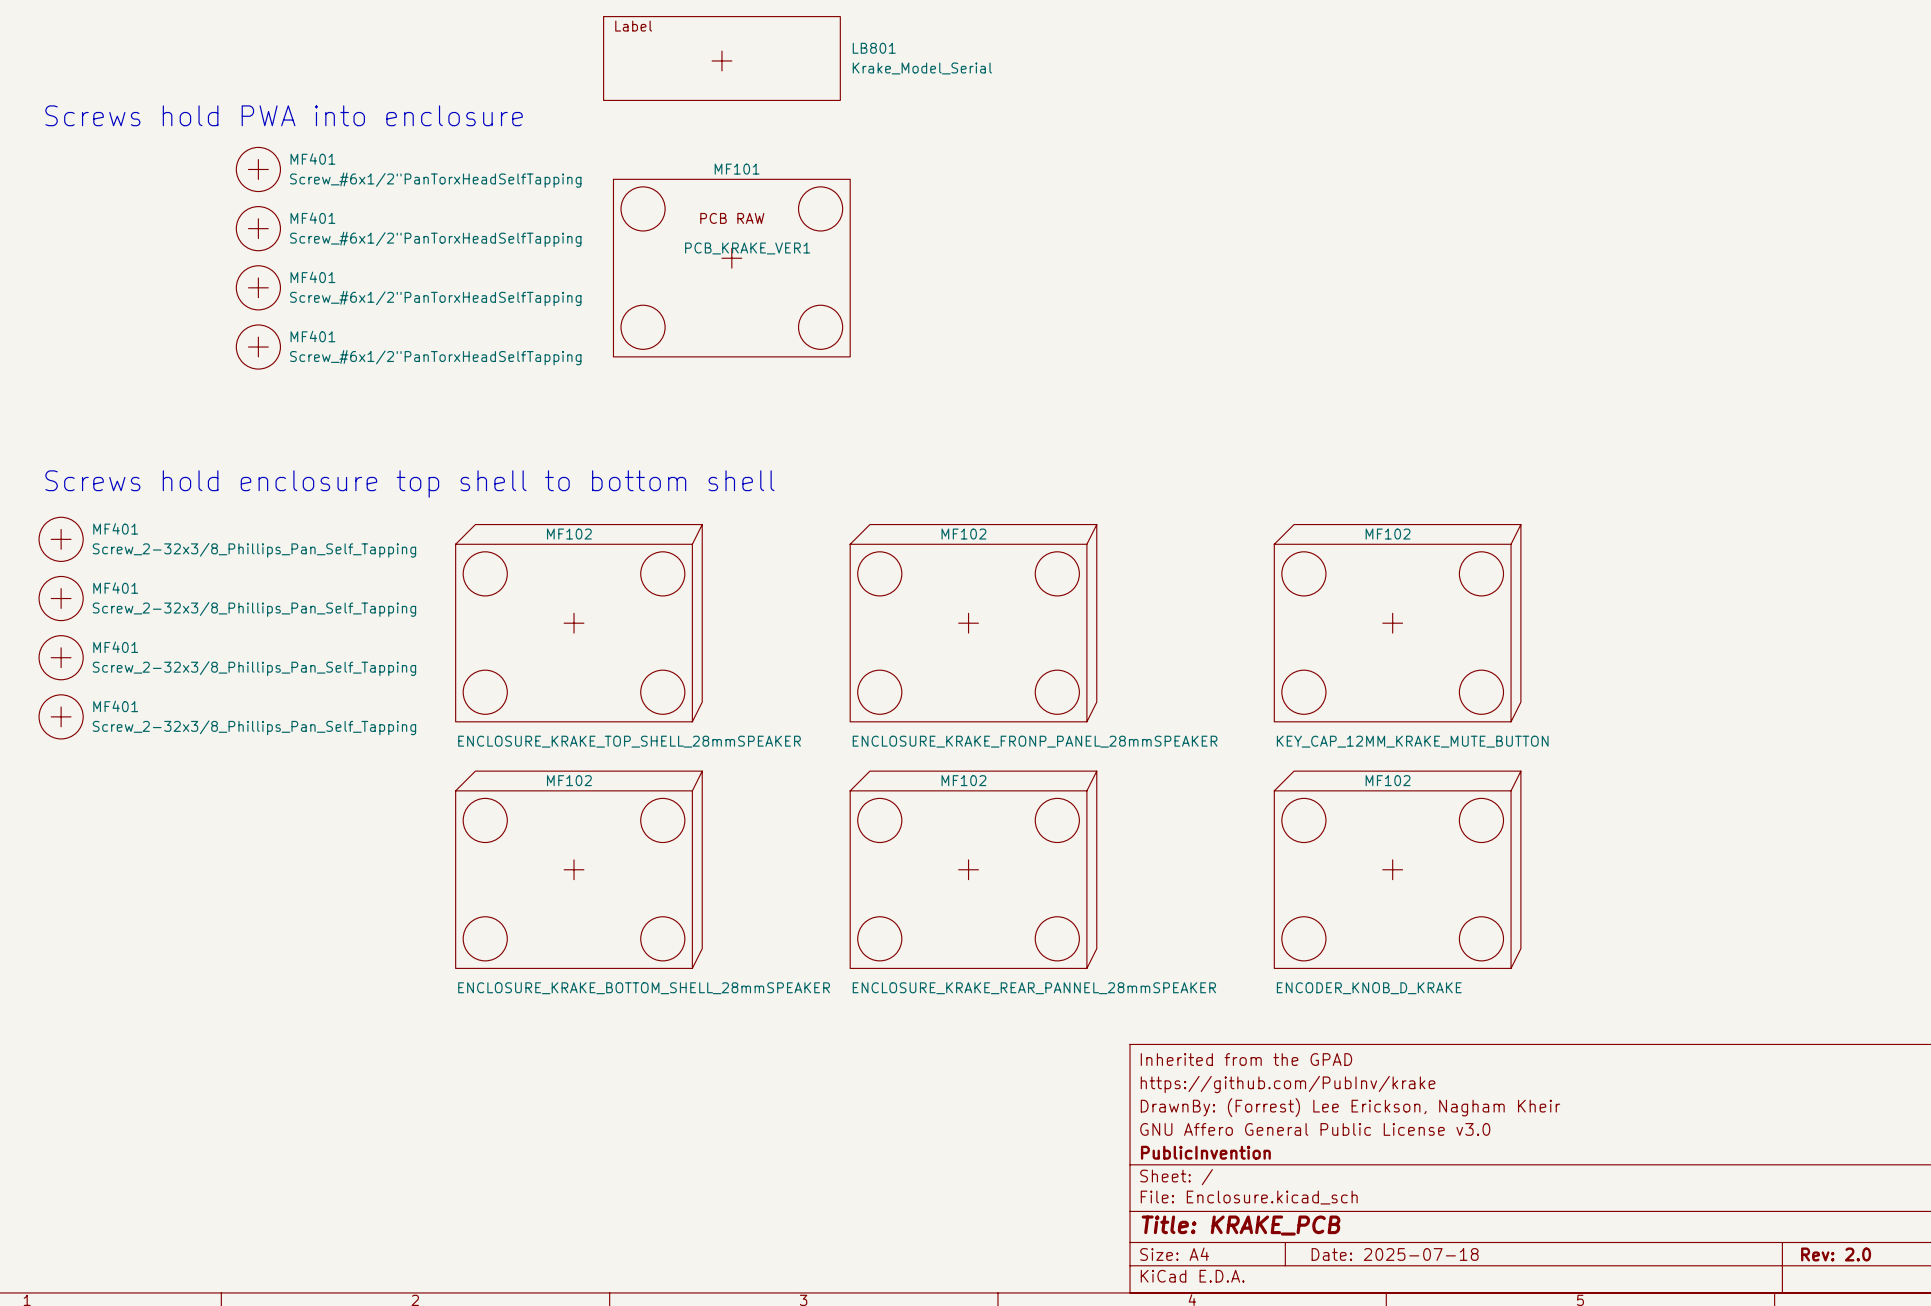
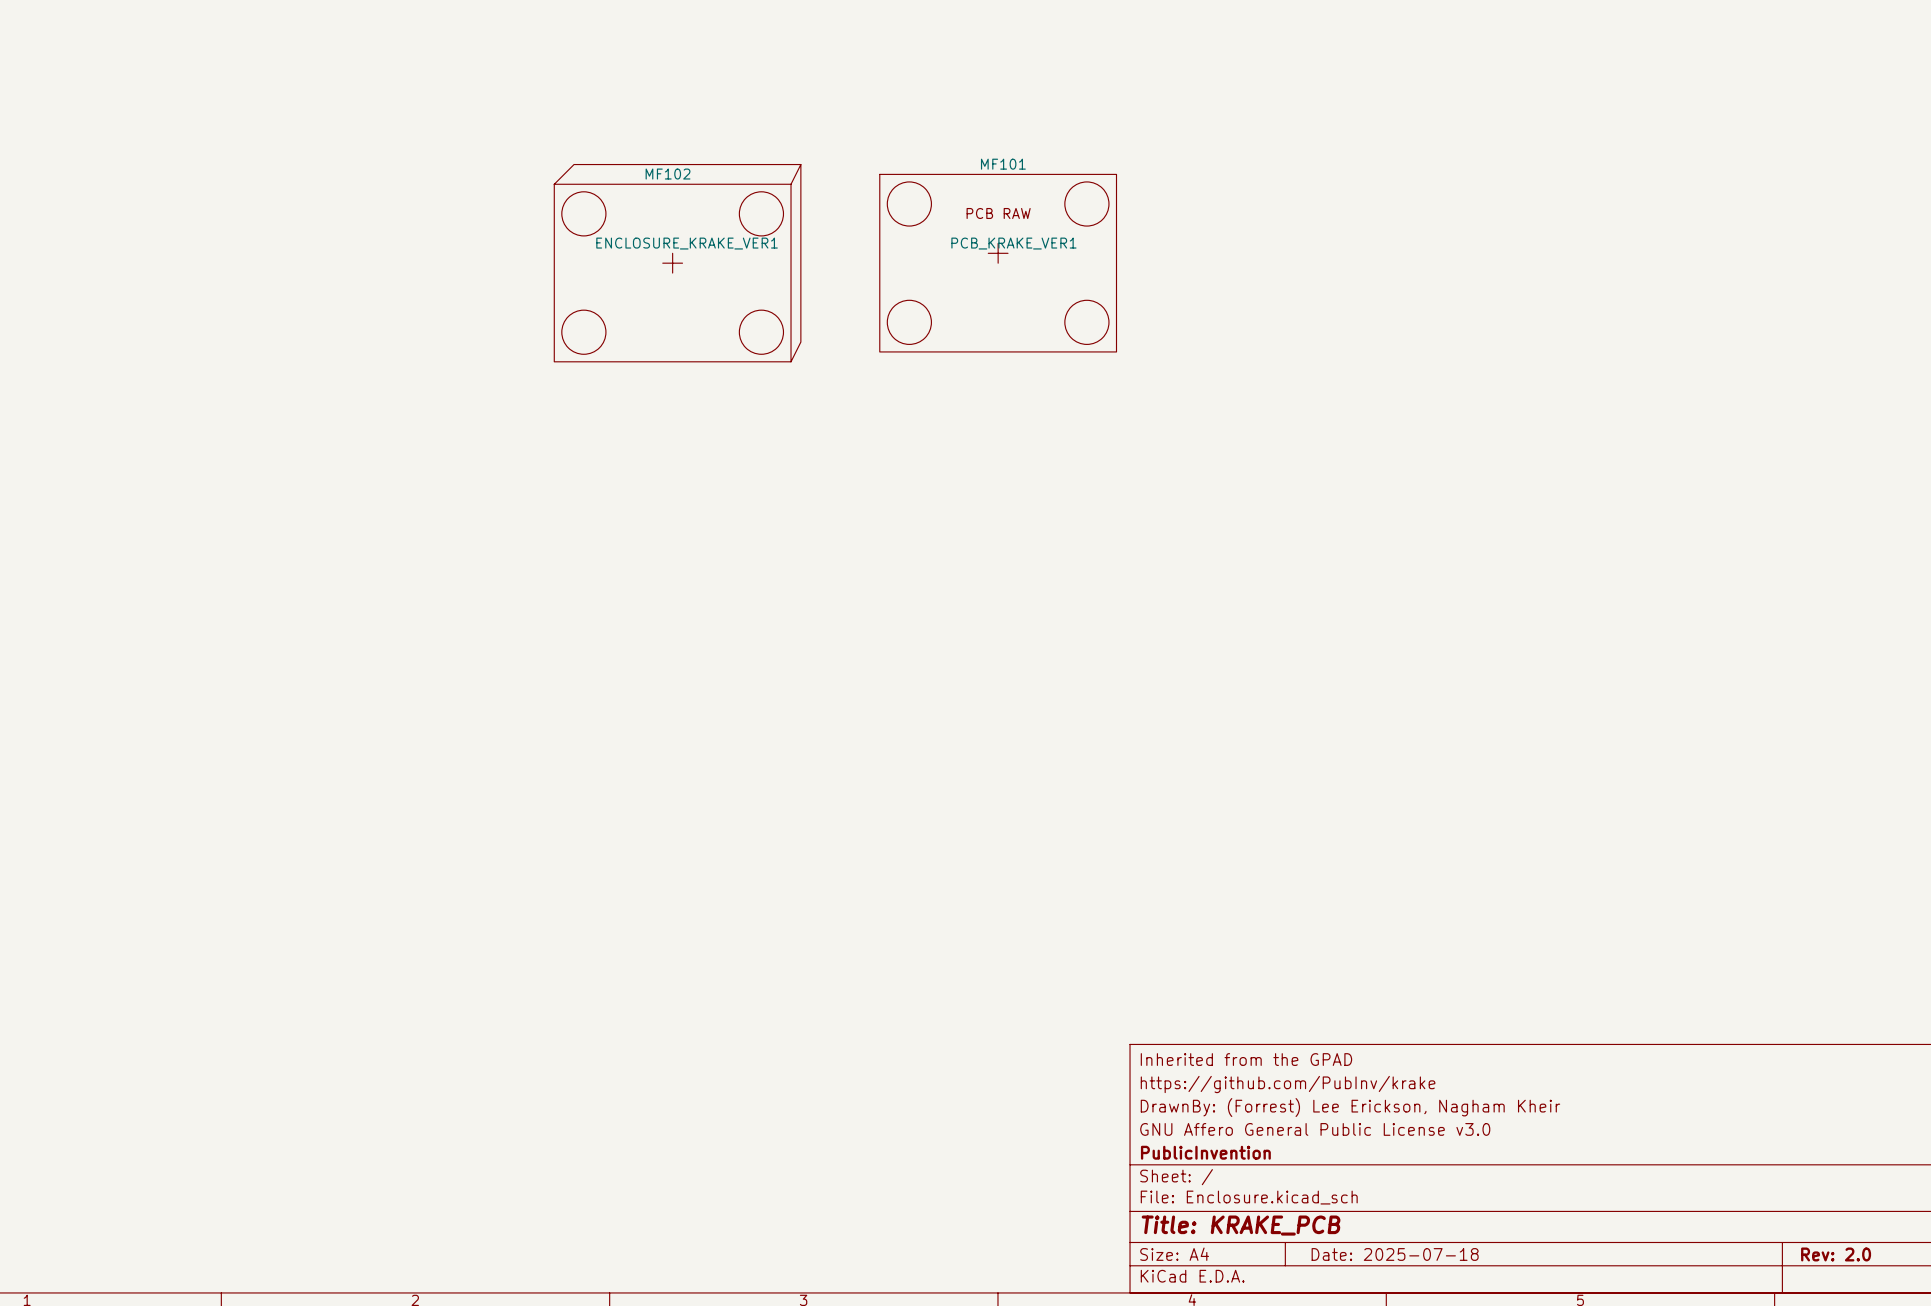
LB801: Krake_Model_Serial (721, 58) -> none
text: Screws hold PWA into enclosure (284, 115) -> none
MF401: Screw_#6x1/2"PanTorxHeadSelfTapping (258, 169) -> none
MF401: Screw_#6x1/2"PanTorxHeadSelfTapping (258, 228) -> none
MF102: none -> ENCLOSURE_KRAKE_VER1 (677, 263)
MF101 position: (731, 268) -> (998, 263)
MF401: Screw_#6x1/2"PanTorxHeadSelfTapping (258, 287) -> none
MF401: Screw_#6x1/2"PanTorxHeadSelfTapping (258, 347) -> none
text: Screws hold enclosure top shell to bottom shell (409, 484) -> none
MF401: Screw_2-32x3/8_Phillips_Pan_Self_Tapping (61, 539) -> none
MF401: Screw_2-32x3/8_Phillips_Pan_Self_Tapping (61, 598) -> none
MF102: ENCLOSURE_KRAKE_TOP_SHELL_28mmSPEAKER (578, 623) -> none
MF102: ENCLOSURE_KRAKE_FRONP_PANEL_28mmSPEAKER (973, 623) -> none
MF102: KEY_CAP_12MM_KRAKE_MUTE_BUTTON (1397, 623) -> none
MF401: Screw_2-32x3/8_Phillips_Pan_Self_Tapping (61, 657) -> none
MF401: Screw_2-32x3/8_Phillips_Pan_Self_Tapping (61, 716) -> none
MF102: ENCLOSURE_KRAKE_BOTTOM_SHELL_28mmSPEAKER (578, 869) -> none
MF102: ENCLOSURE_KRAKE_REAR_PANNEL_28mmSPEAKER (973, 869) -> none
MF102: ENCODER_KNOB_D_KRAKE (1397, 869) -> none

